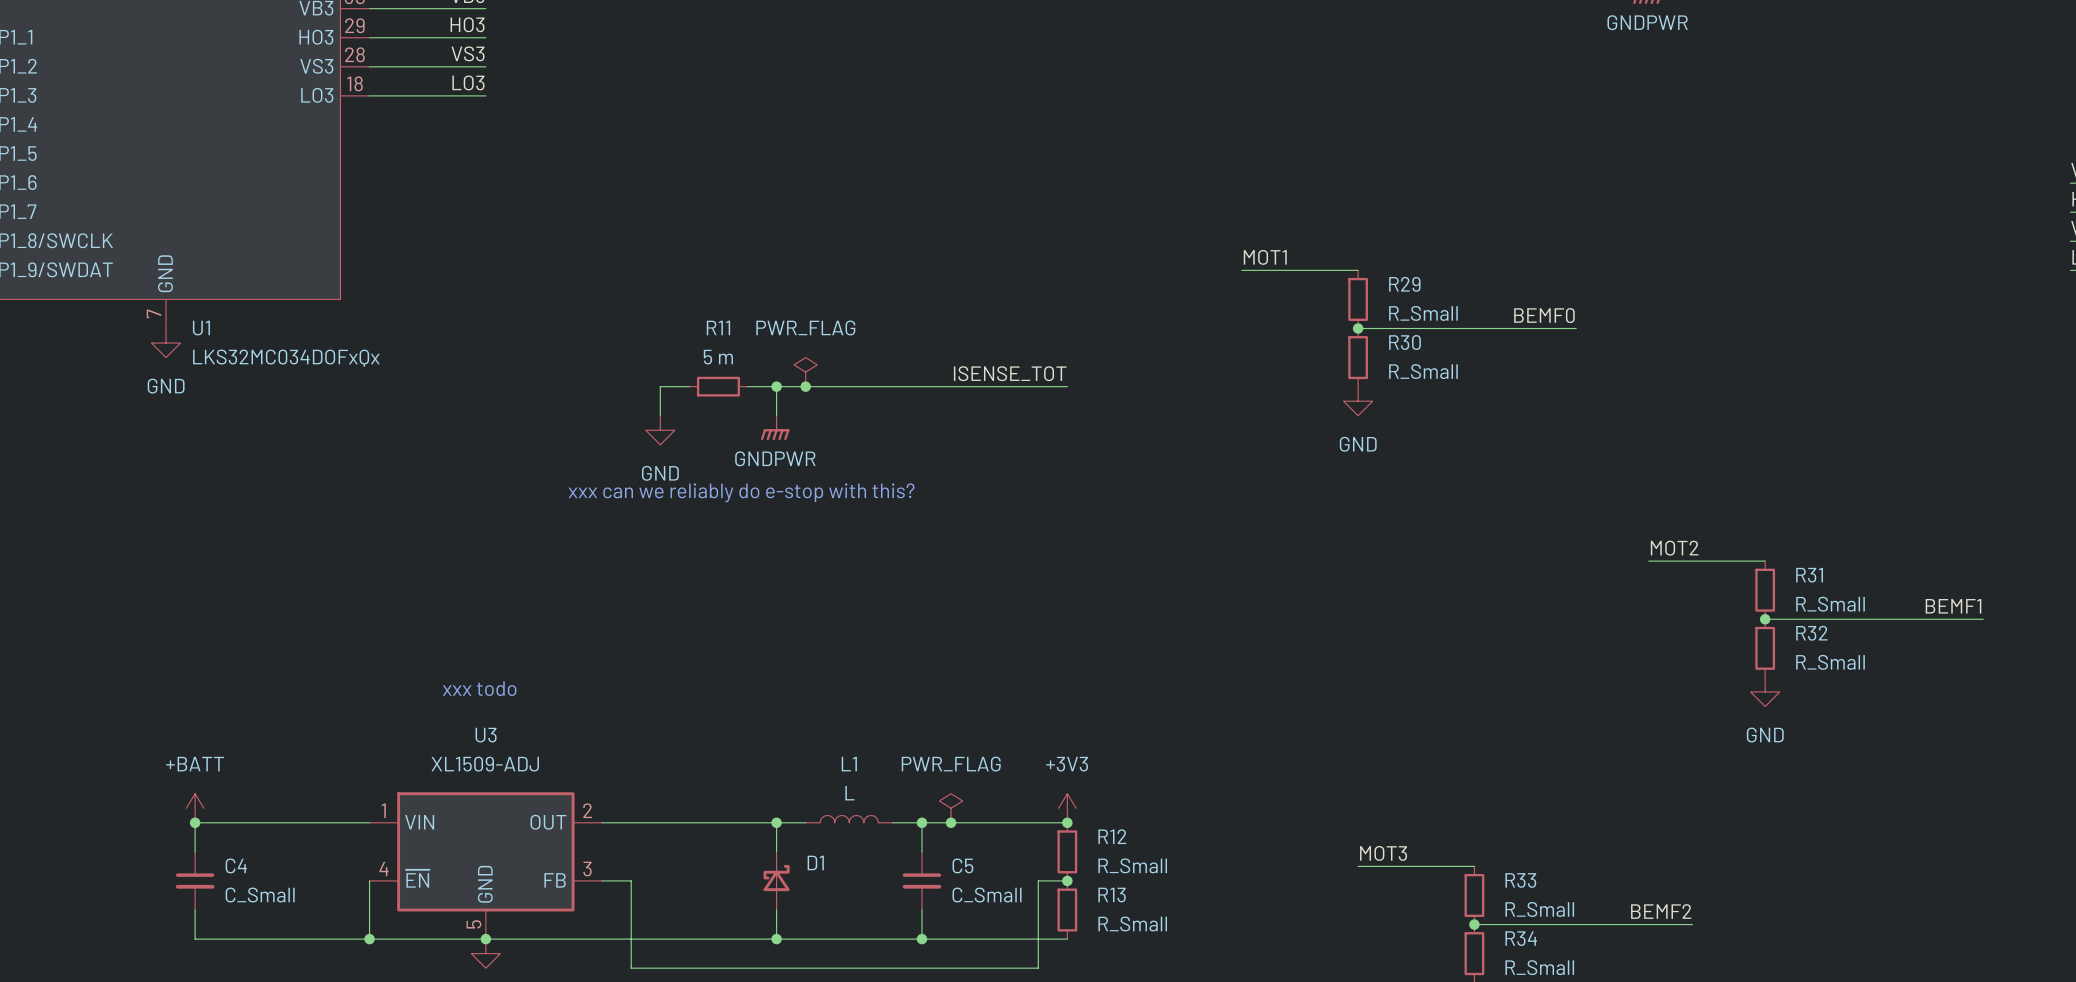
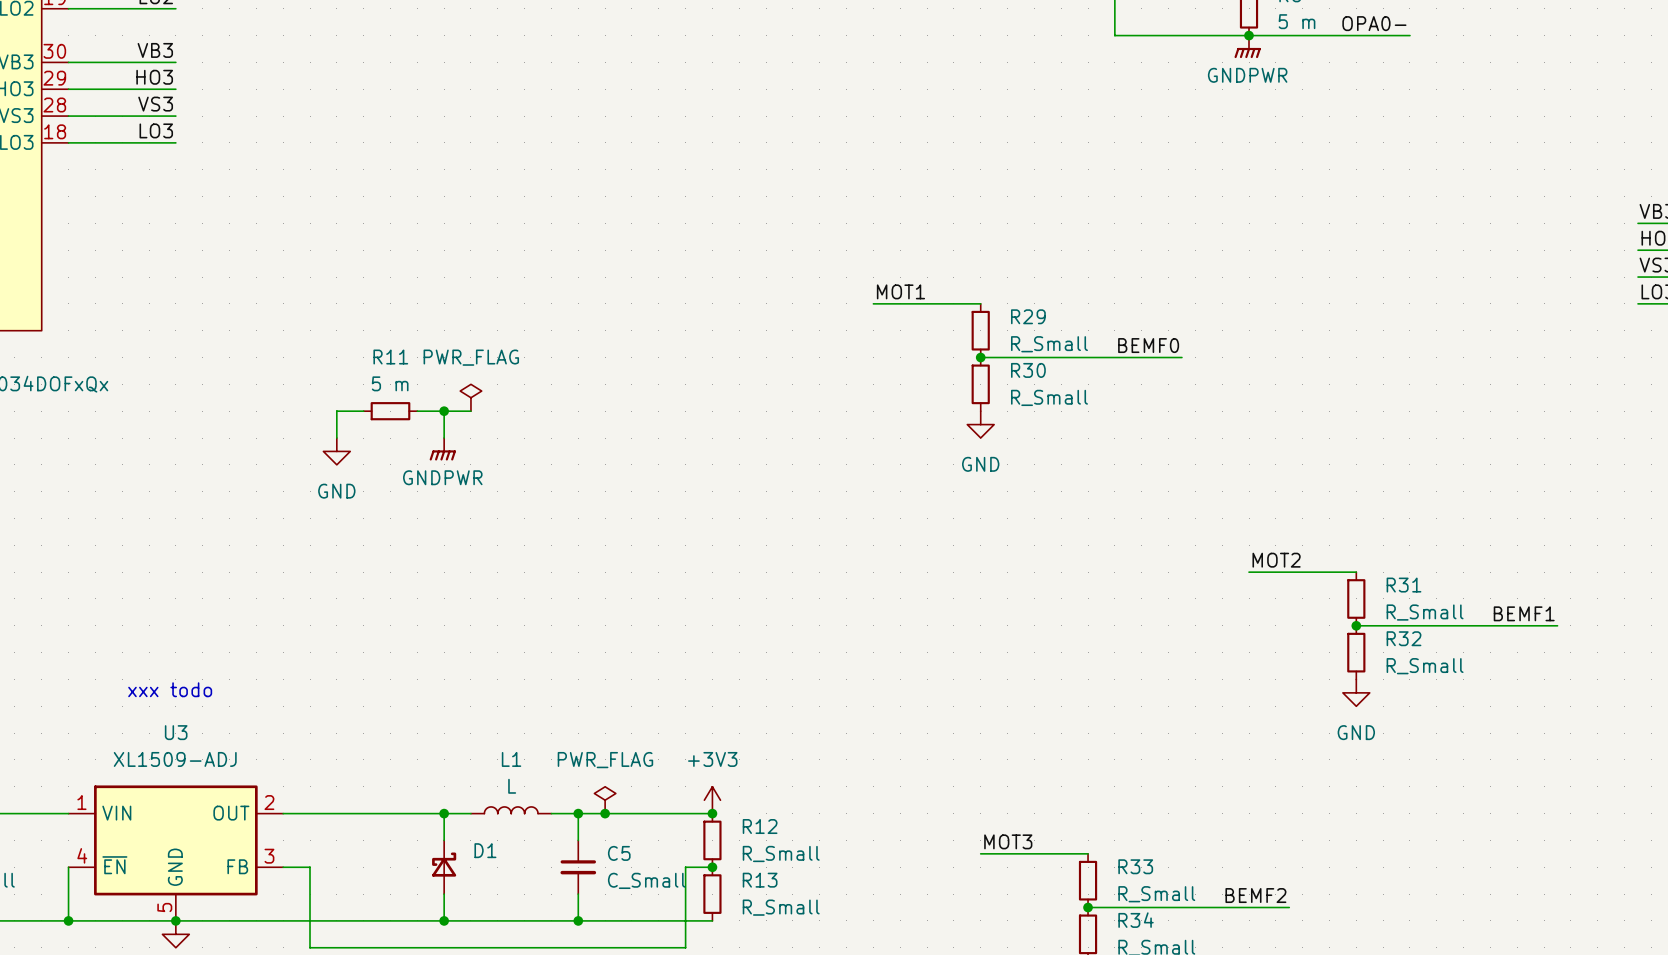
label: ISENSE_TOT (1010, 373) -> none
wire: (805, 386) (1067, 386) -> none
junction: (805, 386) -> none
text: xxx can we reliably do e-stop with this? (741, 492) -> none

